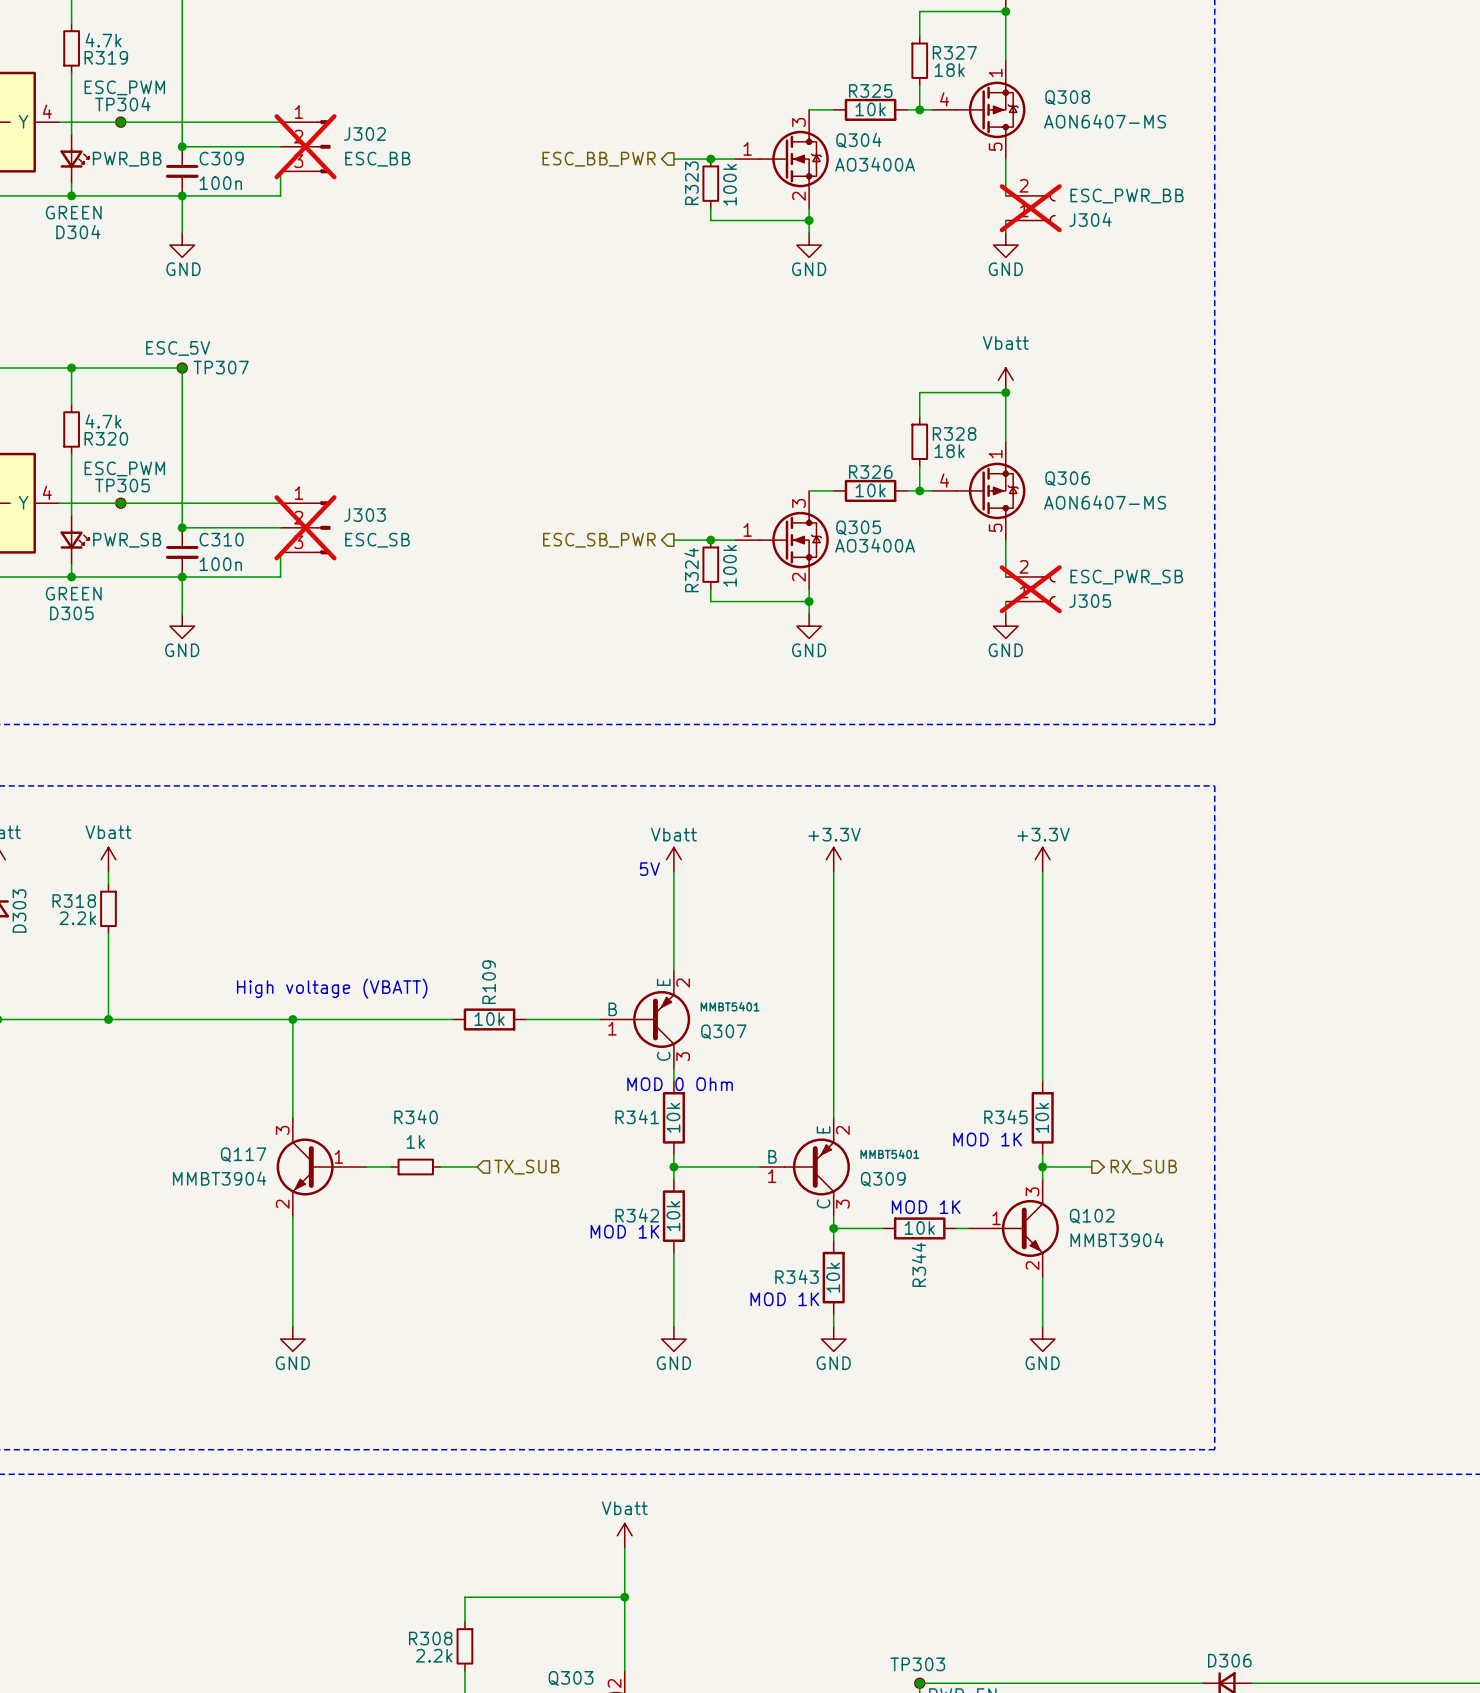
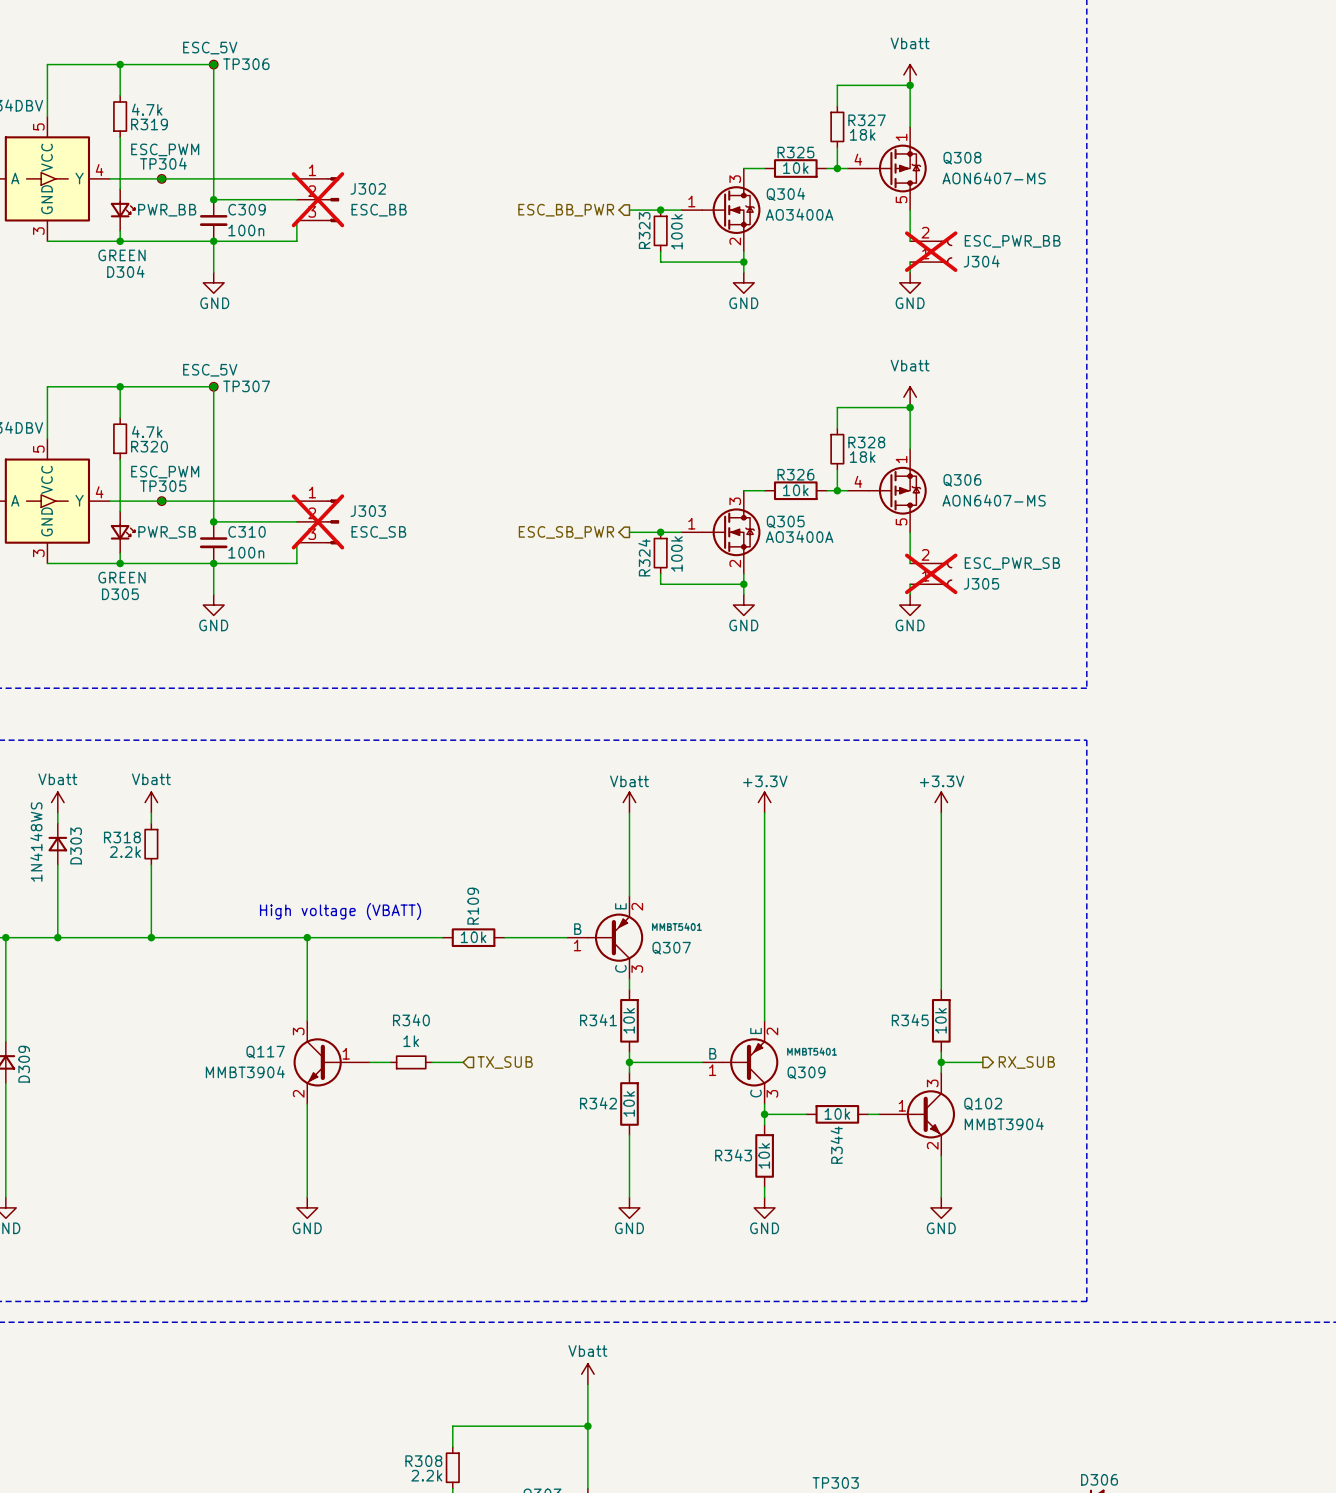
text: 5V (649, 869) -> none
text: MOD 0 Ohm (680, 1084) -> none
text: MOD 1K (987, 1139) -> none
text: MOD 1K (926, 1207) -> none
text: MOD 1K (625, 1231) -> none
text: MOD 1K (784, 1299) -> none

